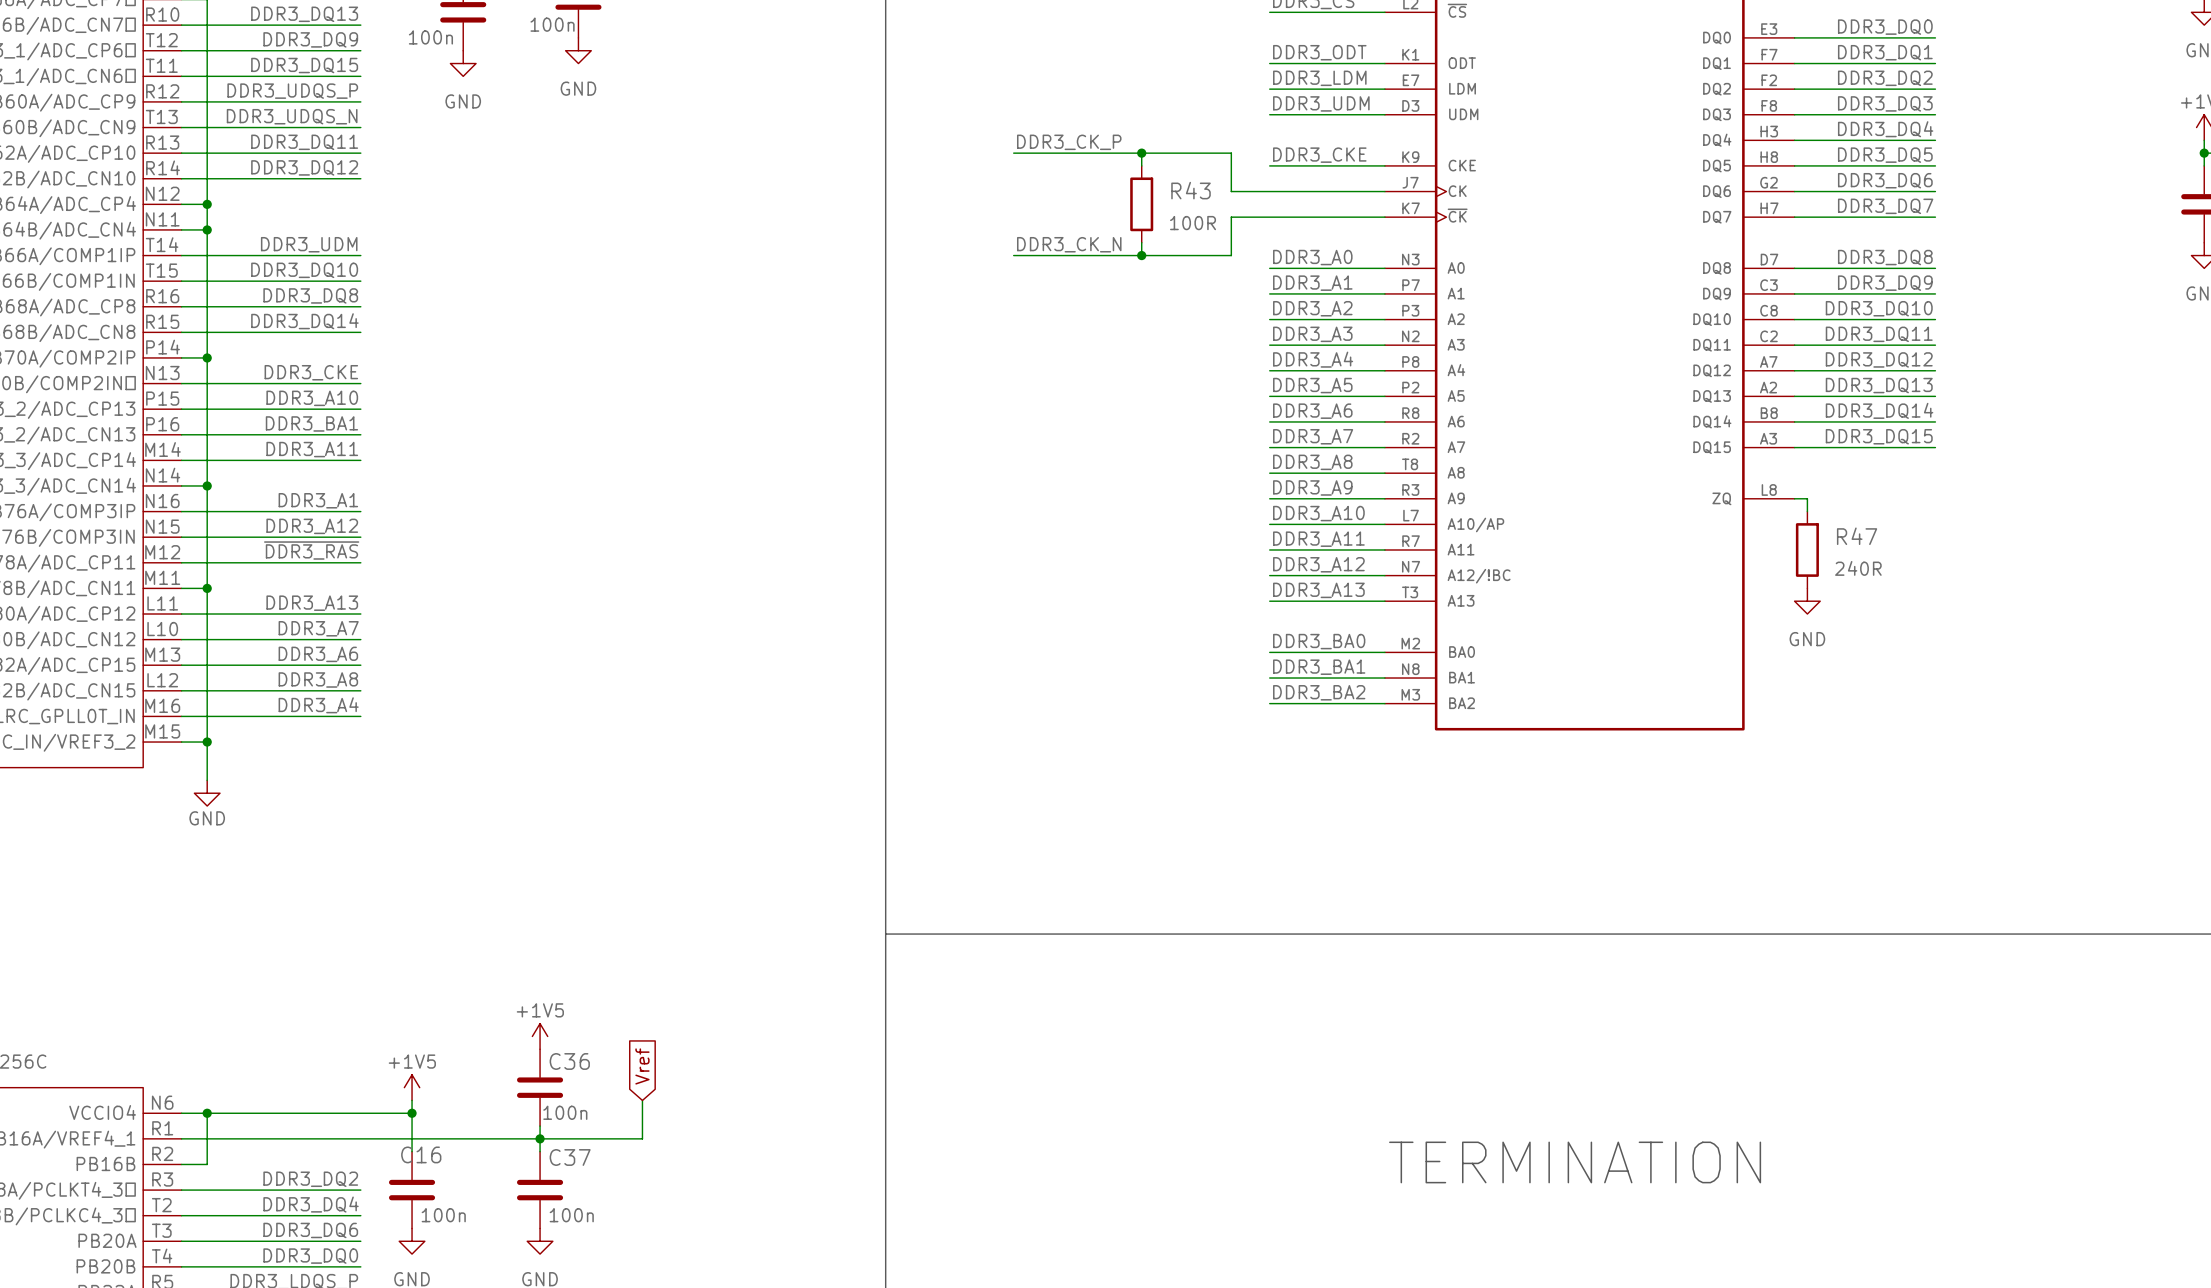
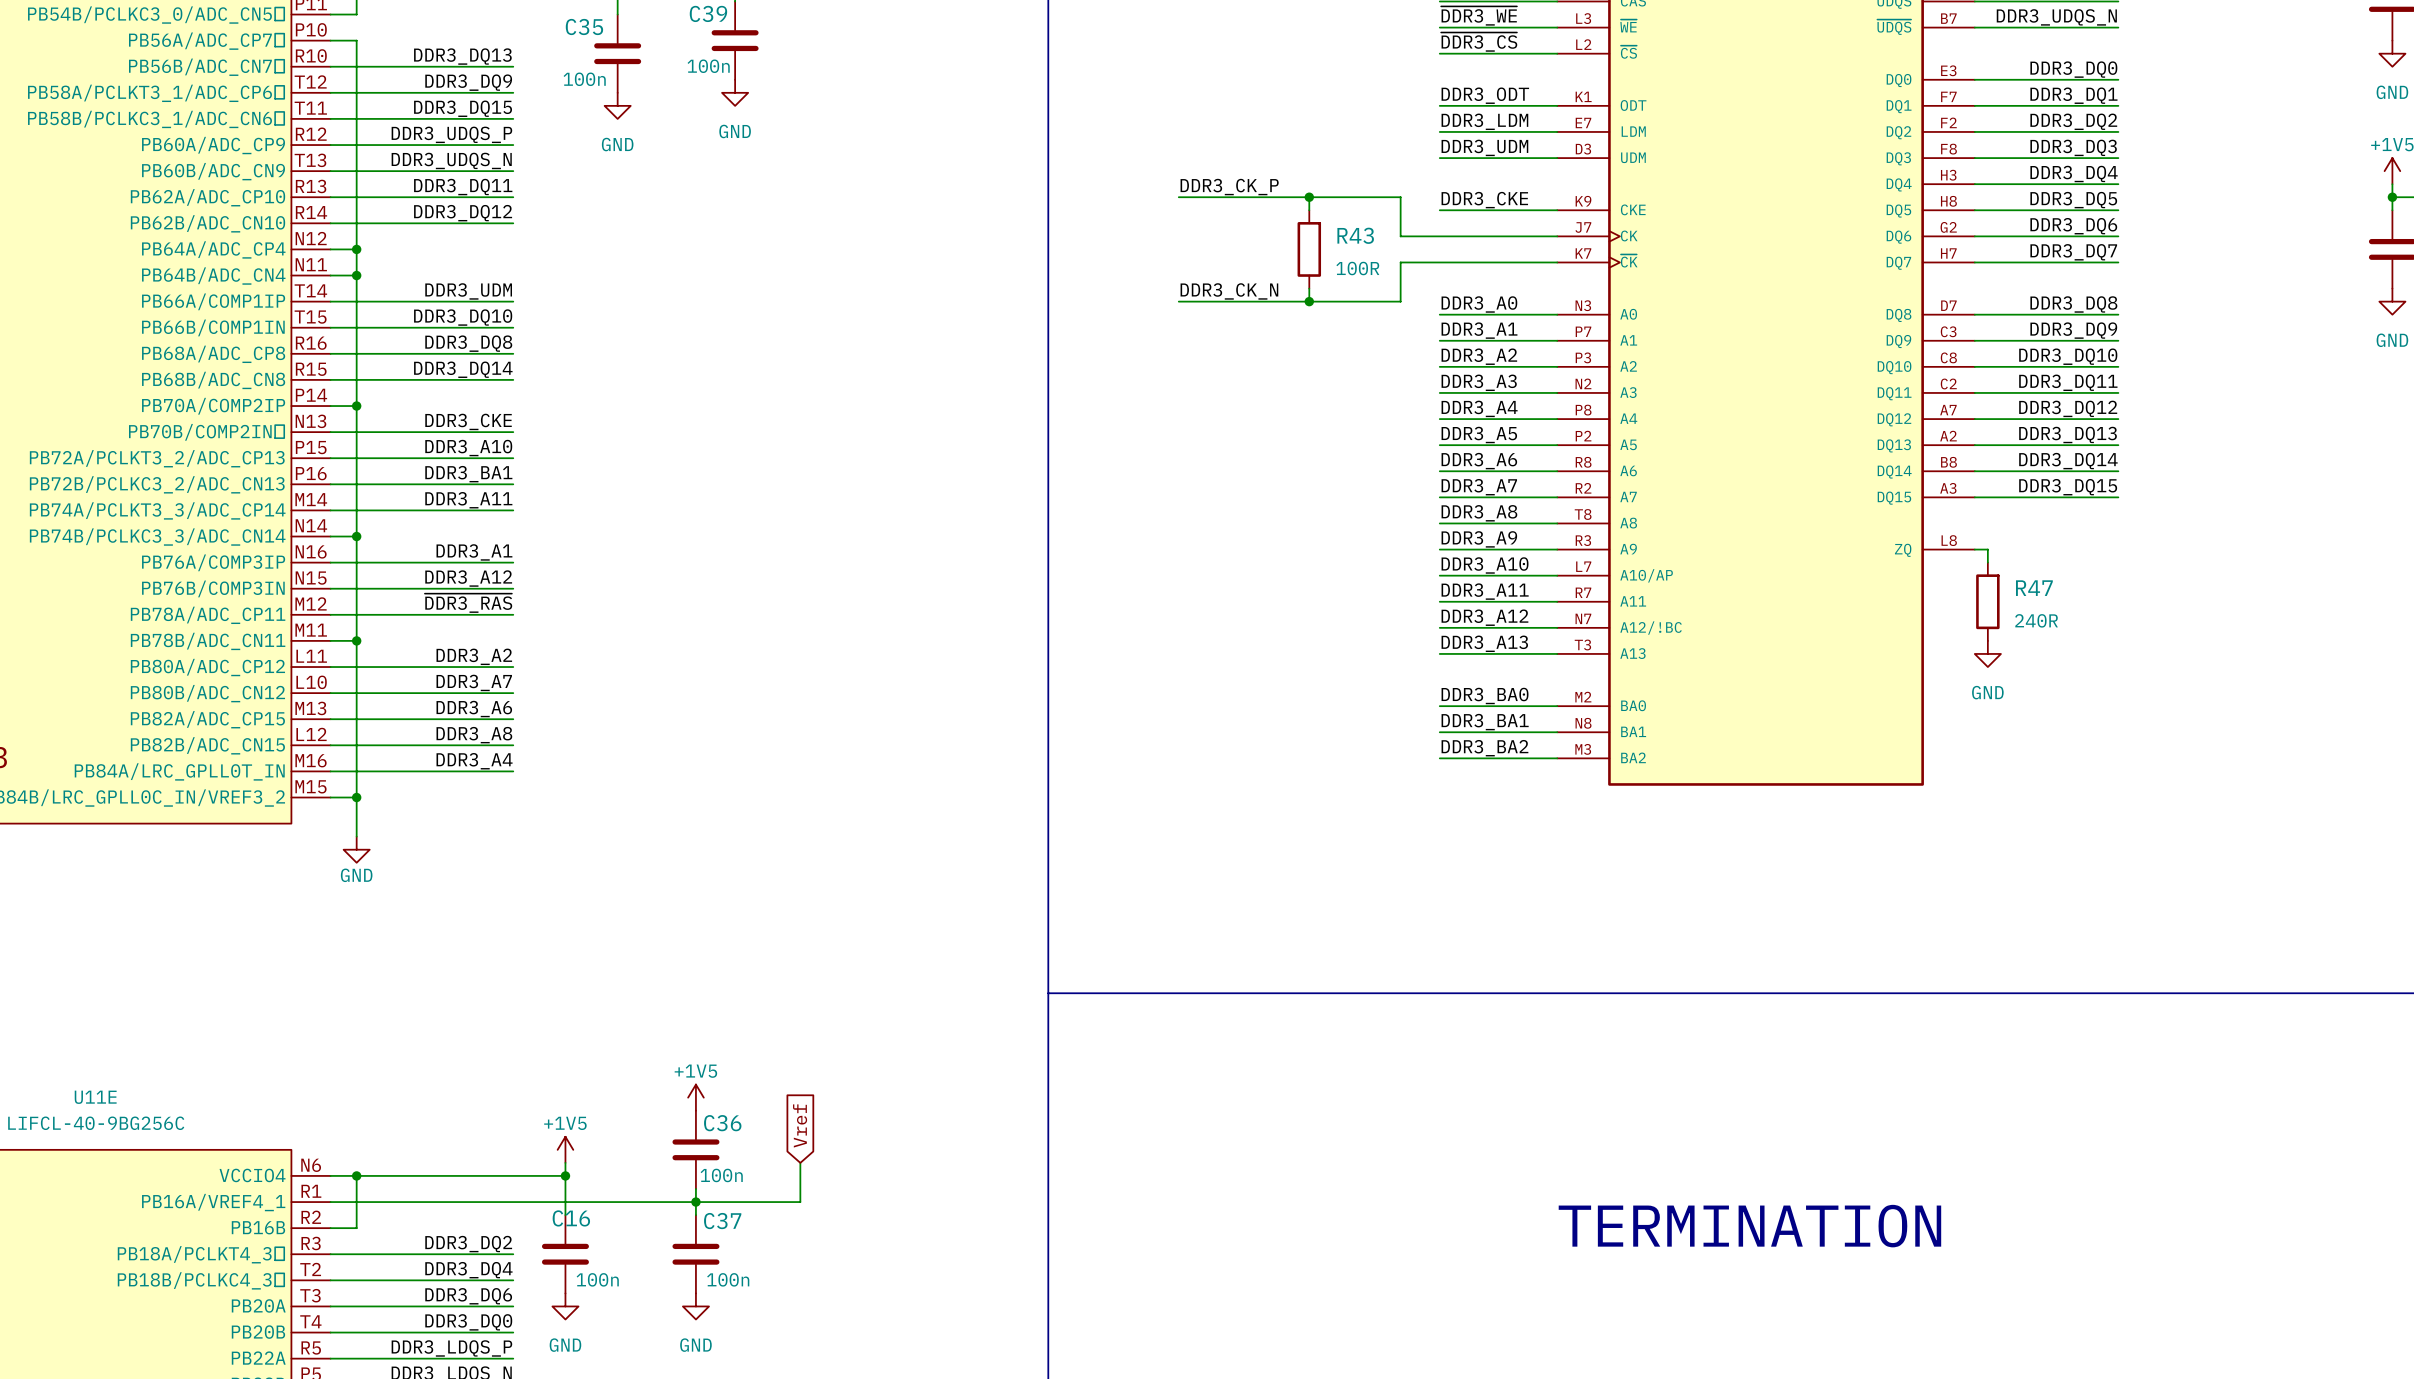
label: DDR3_A13 (312, 603) -> DDR3_A2 (474, 656)

